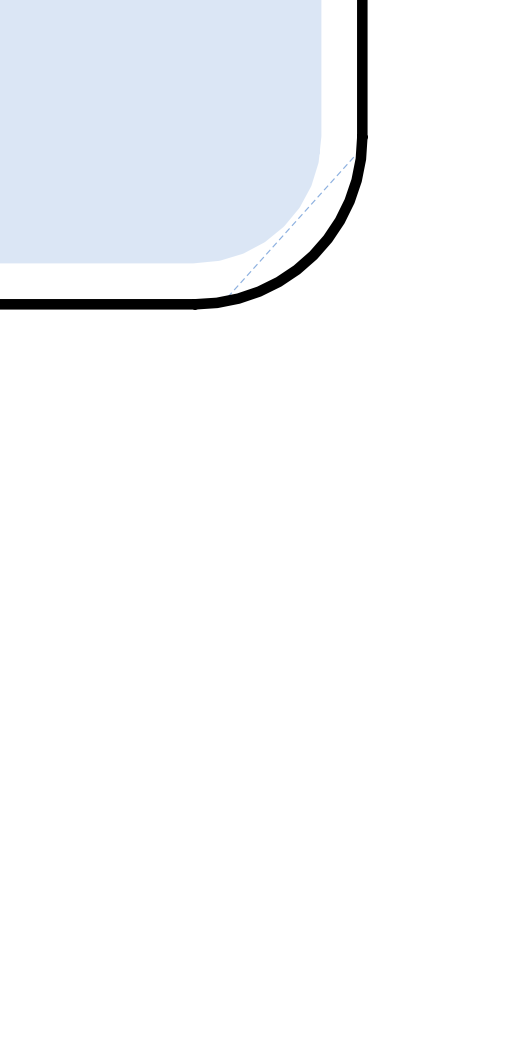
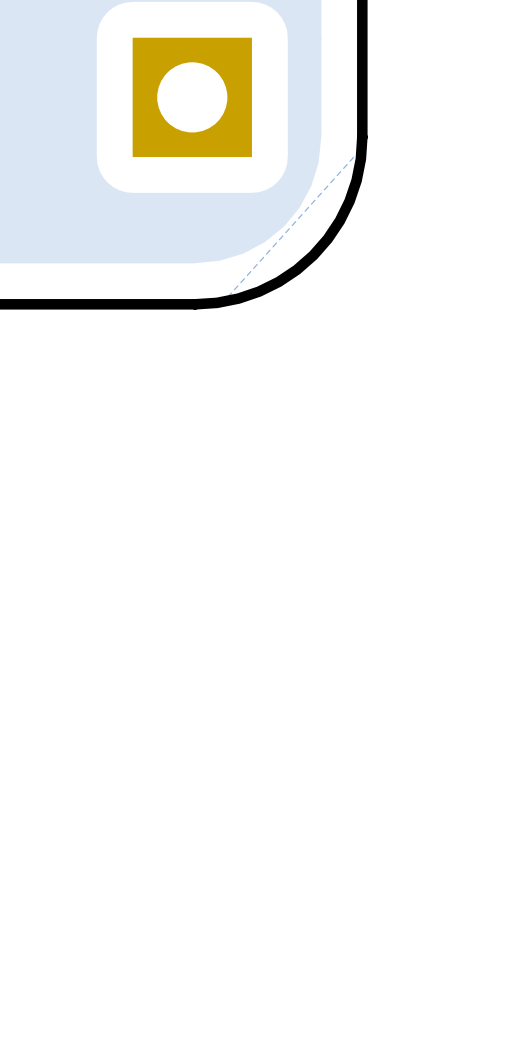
part: none -> (192, 97)

